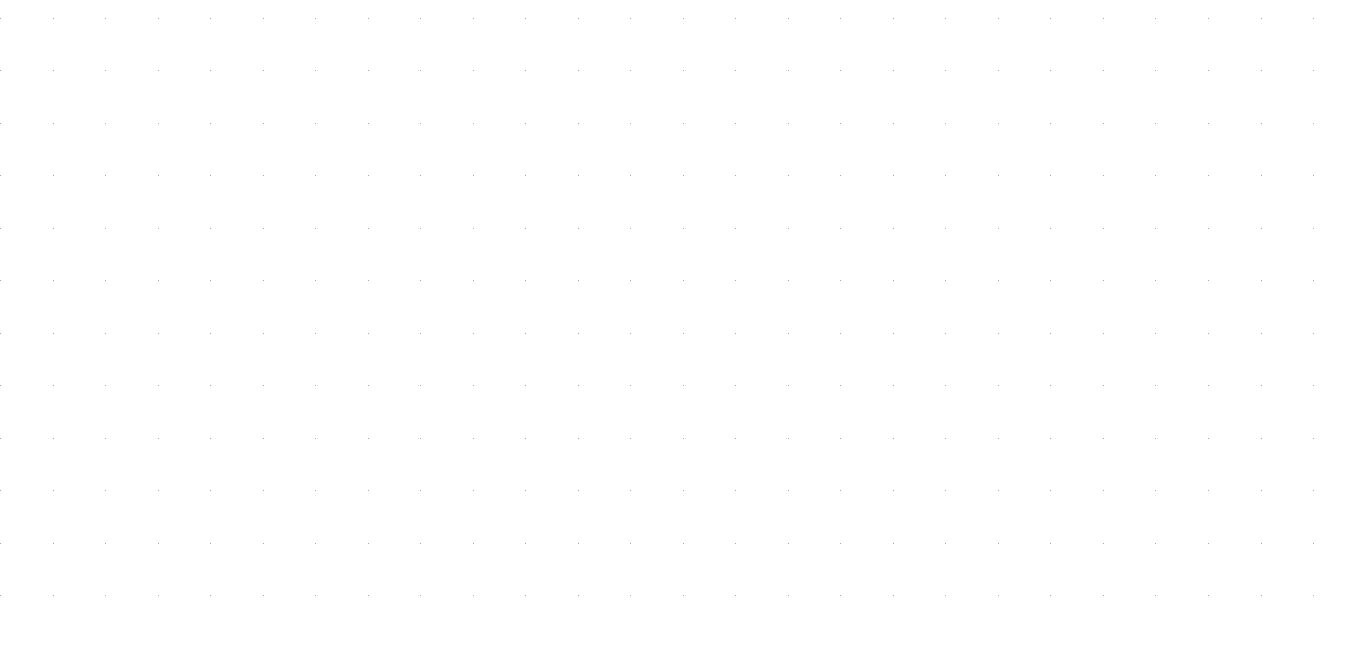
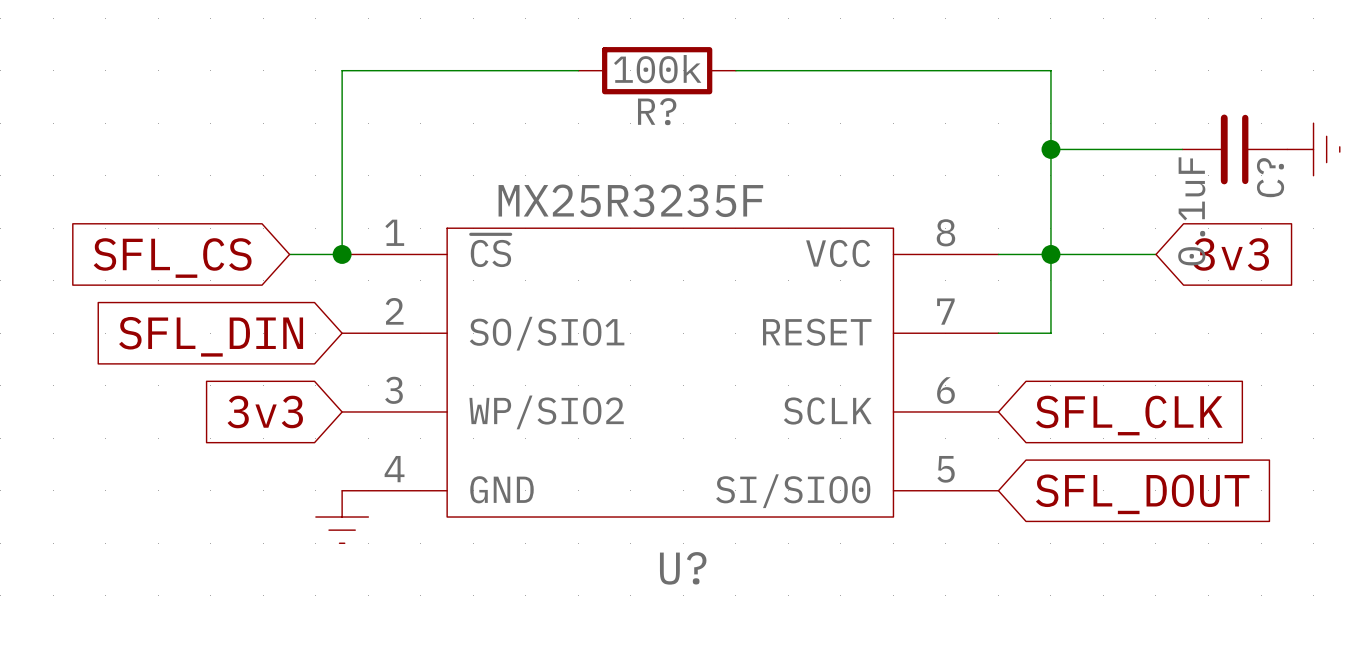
wire: none -> (578, 70) (342, 70) (342, 254) (289, 254)
R?: none -> 100k (657, 70)
wire: none -> (735, 70) (1050, 70) (1050, 333) (998, 333)
wire: none -> (1050, 149) (1182, 149)
junction: none -> (1050, 149)
C?: none -> 0.1uF (1234, 149)
power symbol: none -> (1313, 149)
junction: none -> (342, 254)
wire: none -> (998, 254) (1155, 254)
junction: none -> (1050, 254)
global label: none -> 3v3 (1231, 254)
global label: none -> SFL_CS (172, 258)
global label: none -> SFL_DIN (211, 336)
U?: none -> MX25R3235F (670, 372)
global label: none -> 3v3 (265, 411)
global label: none -> SFL_CLK (1129, 415)
global label: none -> SFL_DOUT (1142, 494)
power symbol: none -> (342, 517)

